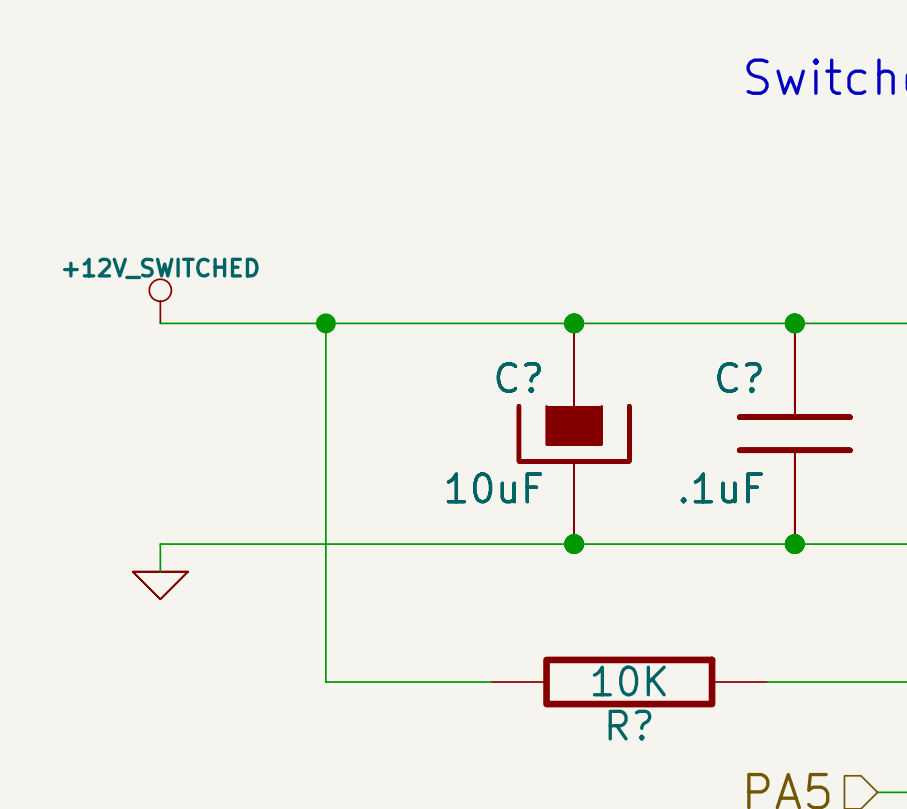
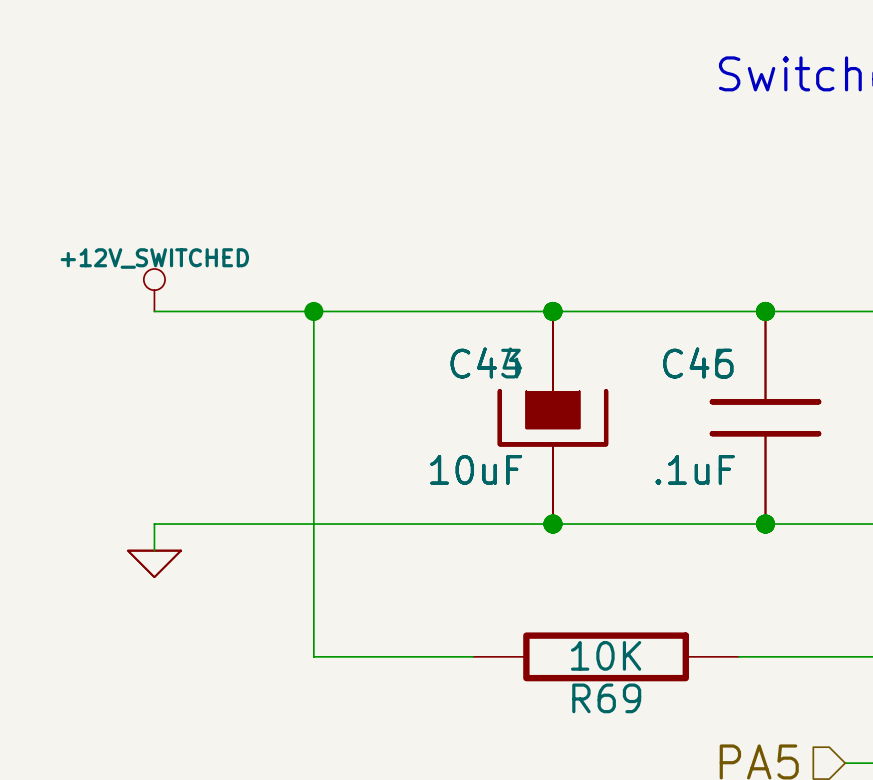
C?: 10uF (574, 433) -> none
part: none -> 10uF (552, 417)
part: none -> 10uF (552, 417)
C?: .1uF (794, 433) -> none
part: none -> .1uF (765, 417)
part: none -> .1uF (765, 417)
R? name: R? (629, 725) -> R69 (606, 698)

